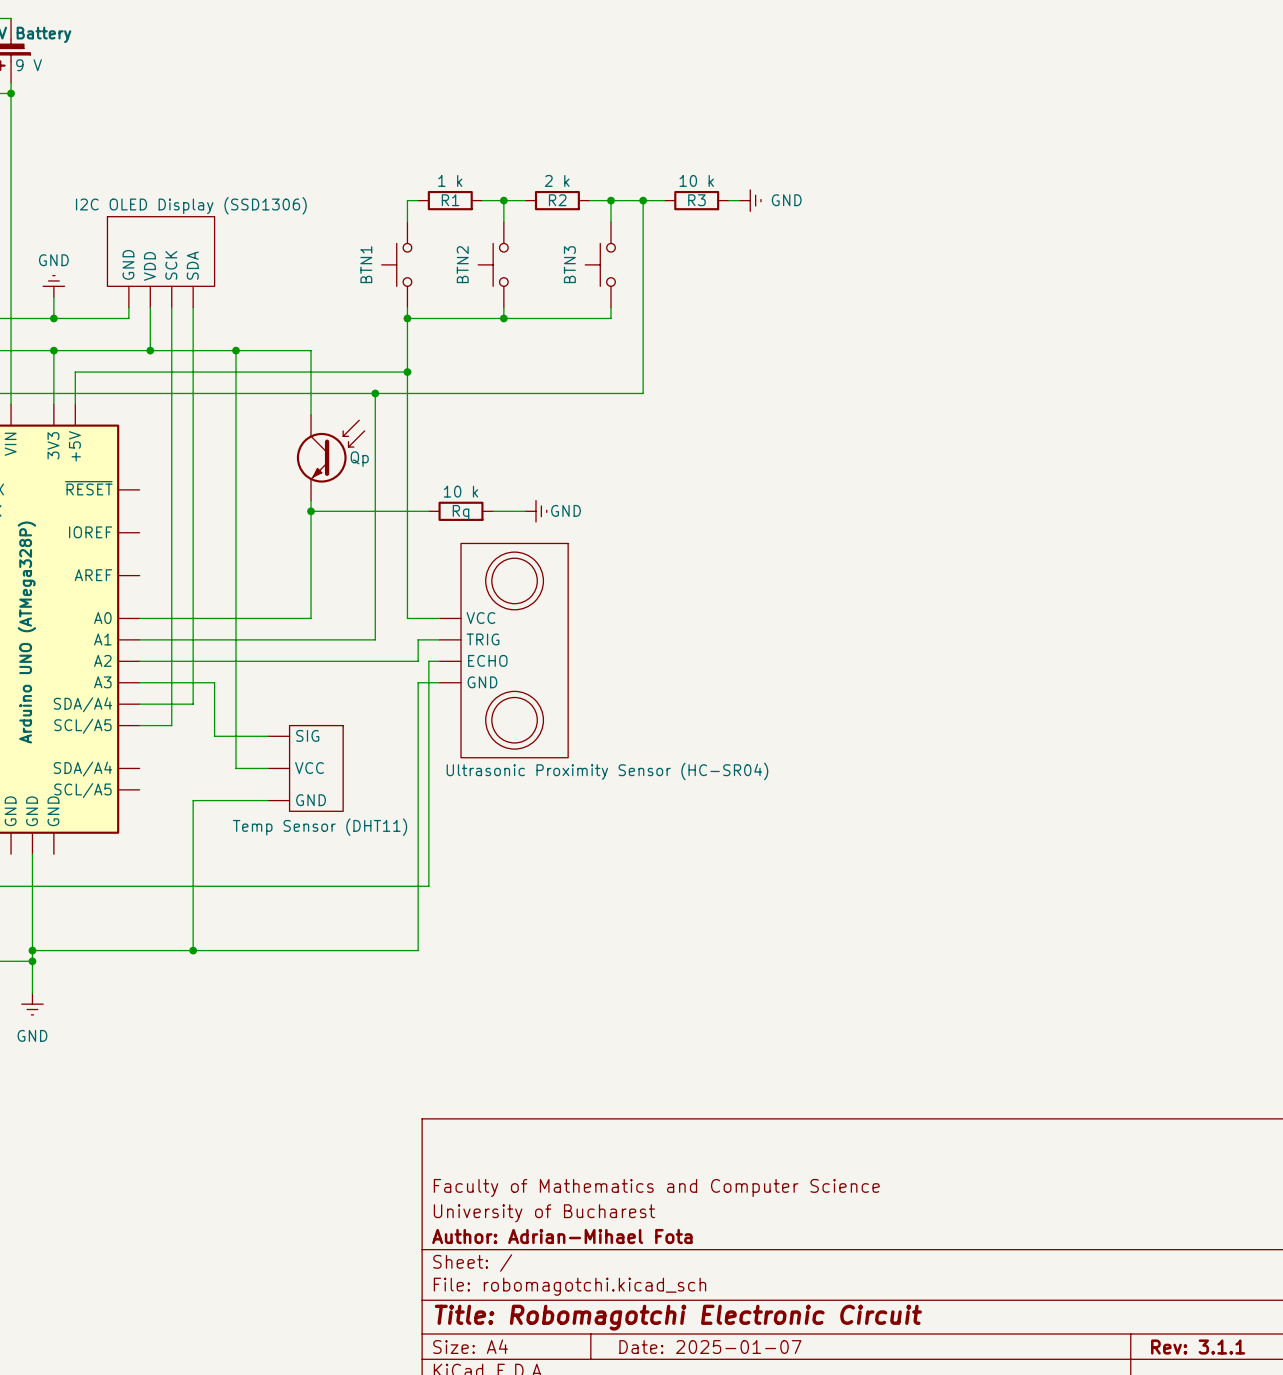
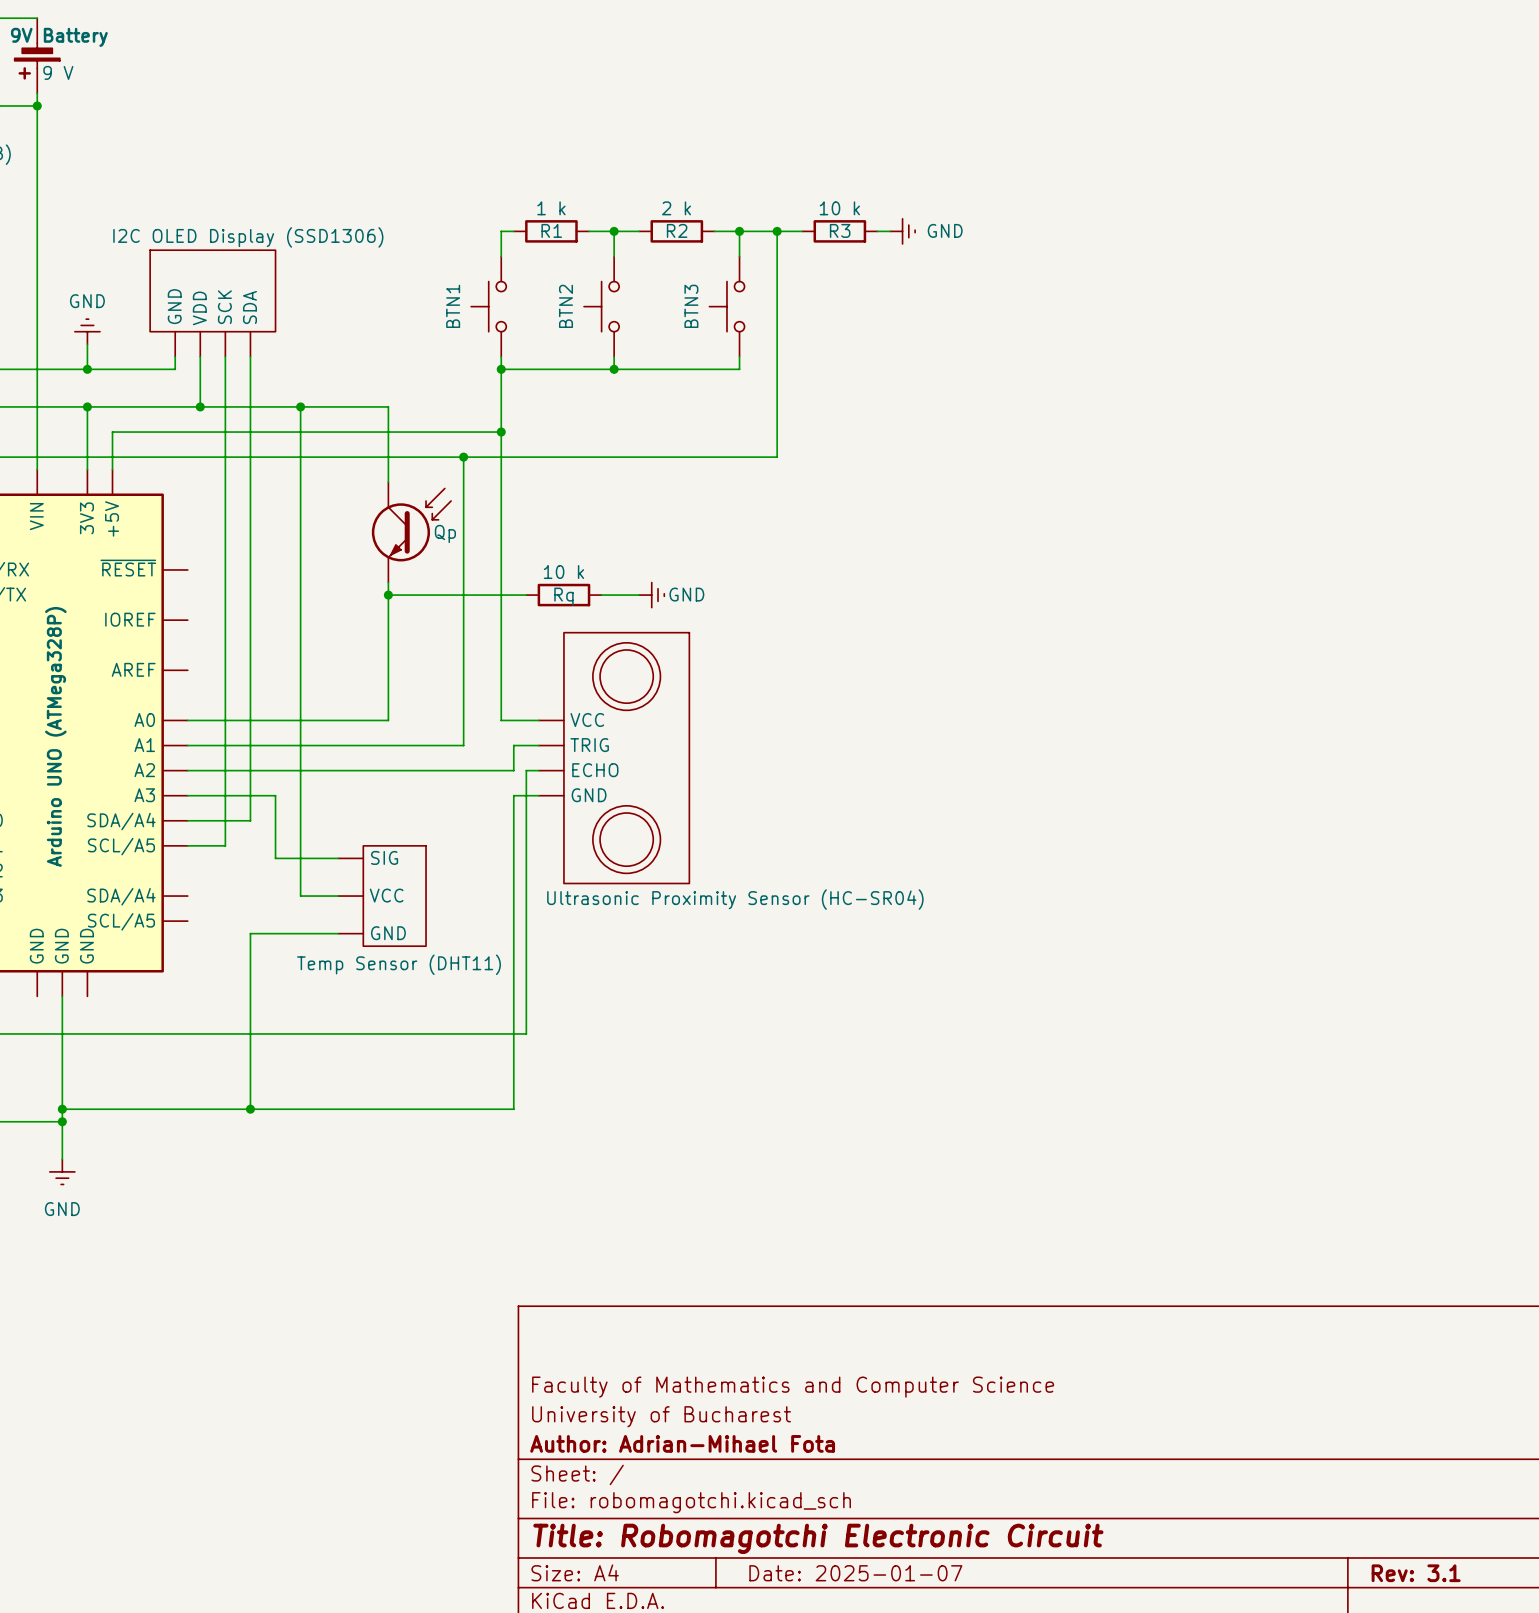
title block: Rev: 3.1.1 (1198, 1347) -> Rev: 3.1 (1416, 1573)

